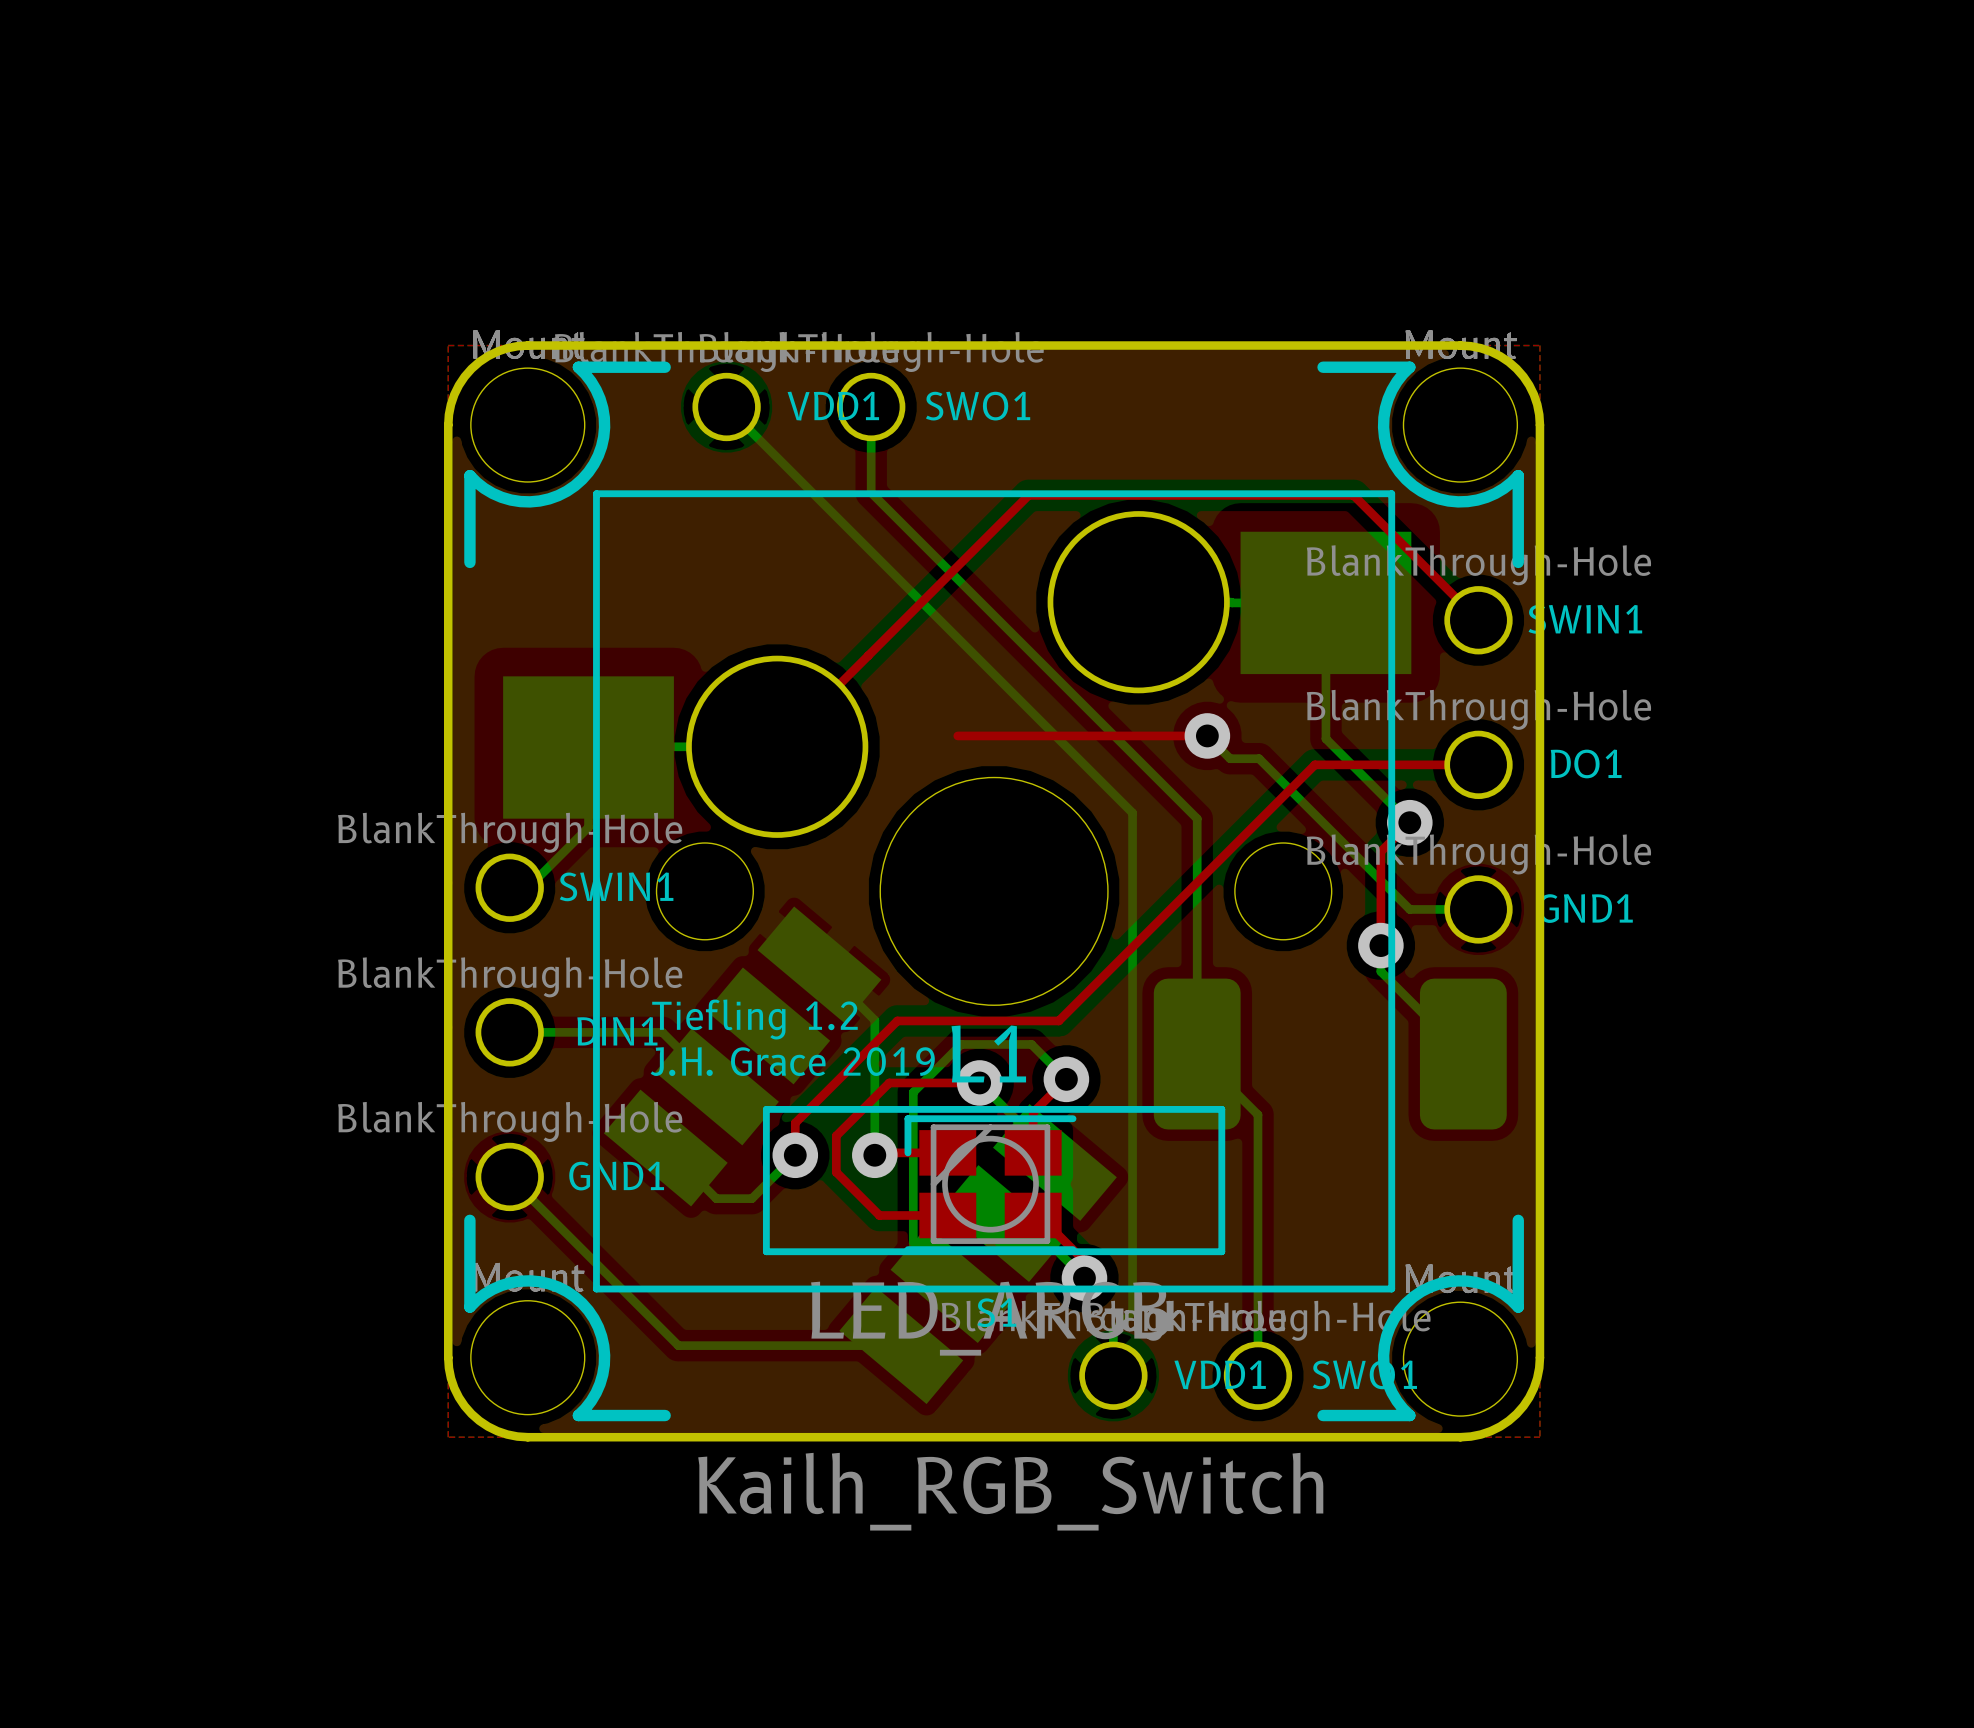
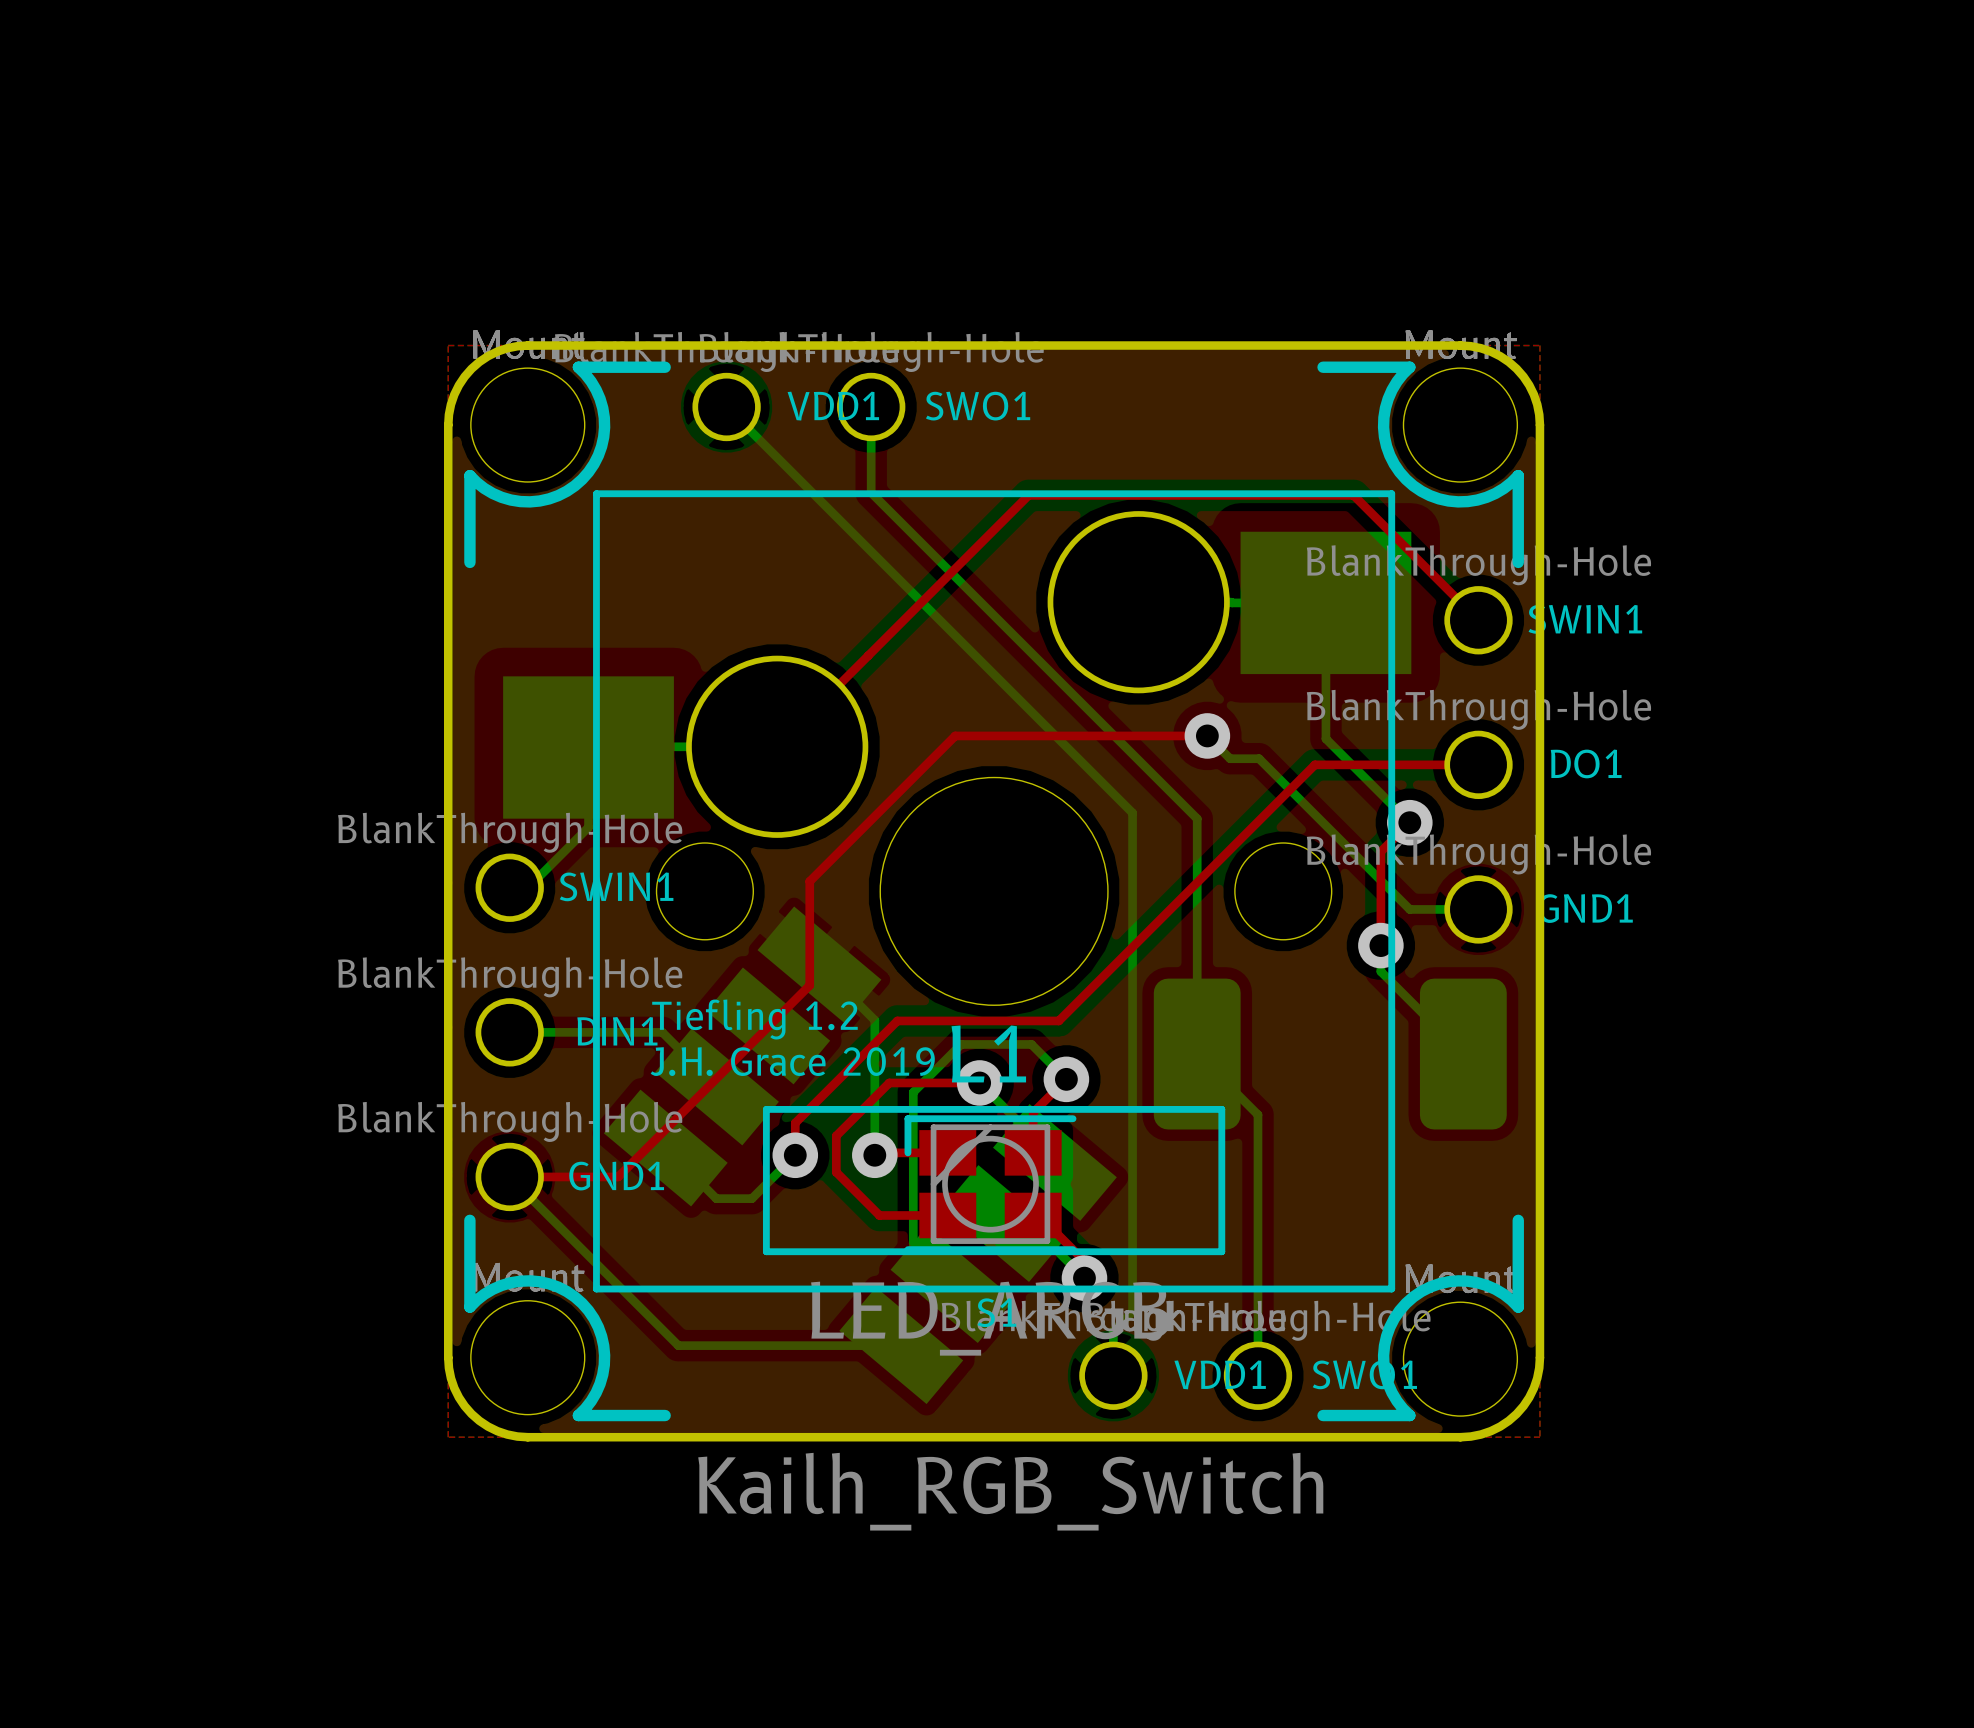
top track: none -> (957, 735) (955, 735) (809, 881) (809, 985) (618, 1176) (509, 1176)

